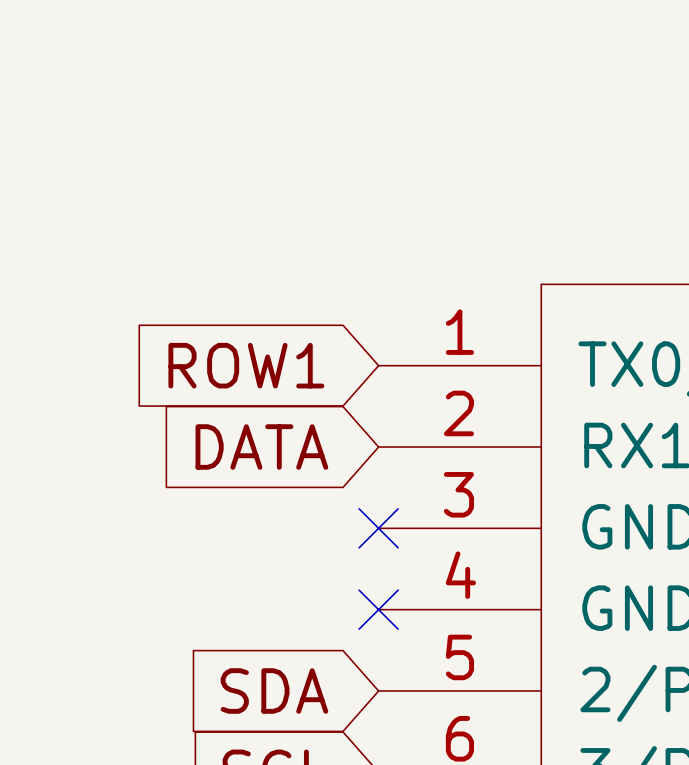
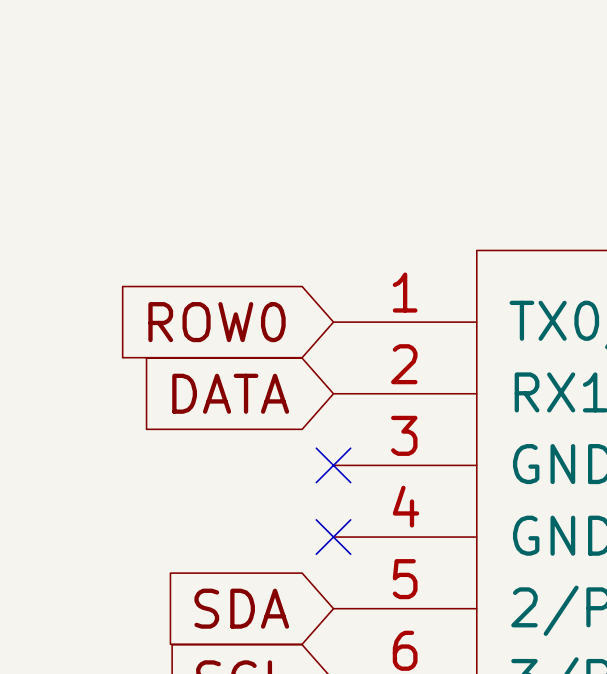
global label: ROW1 (246, 365) -> ROW0 (217, 322)

